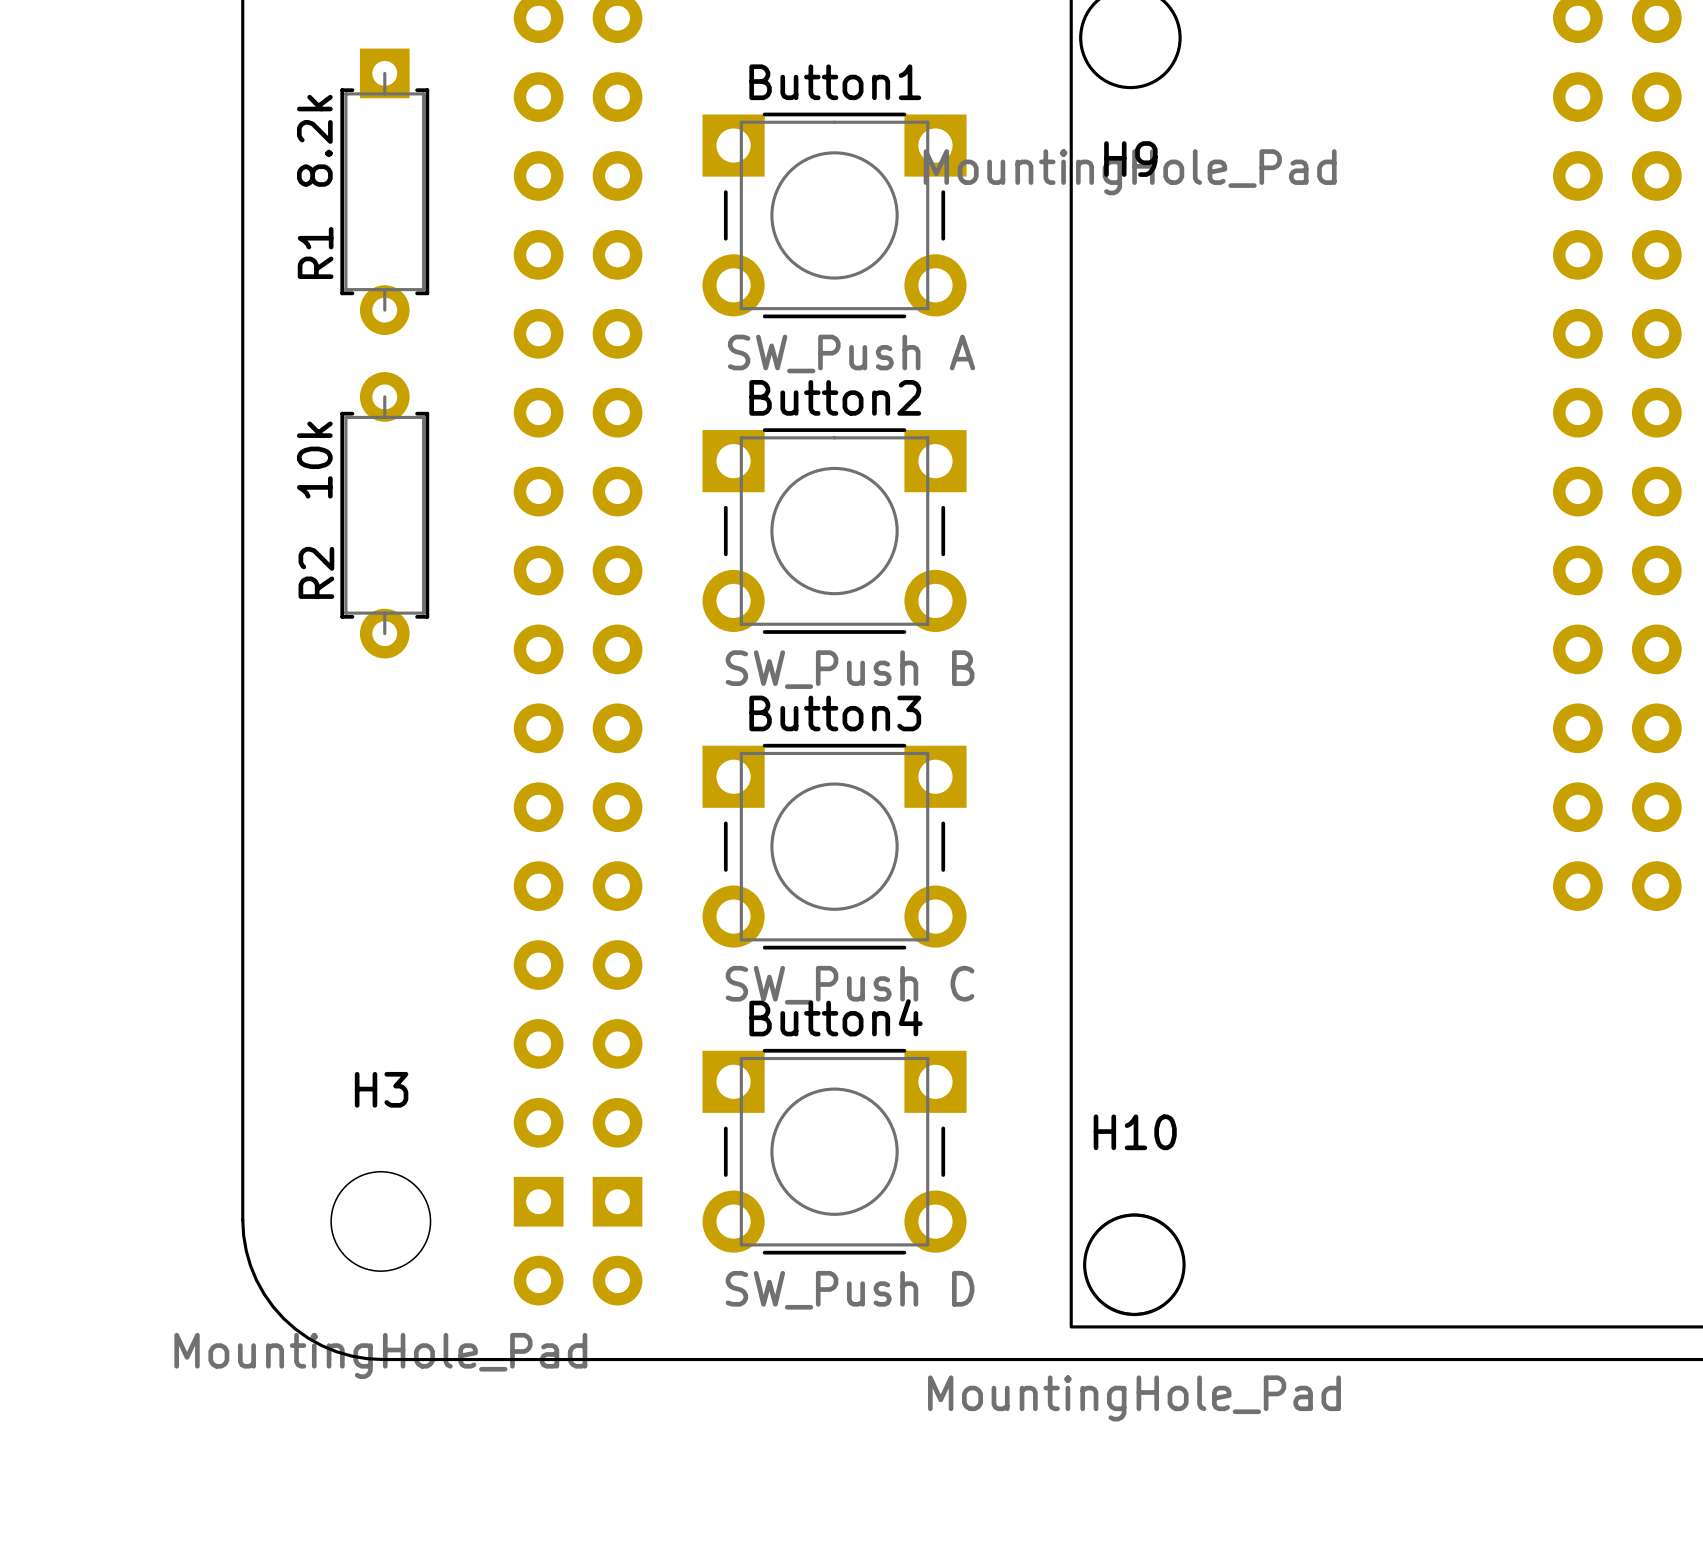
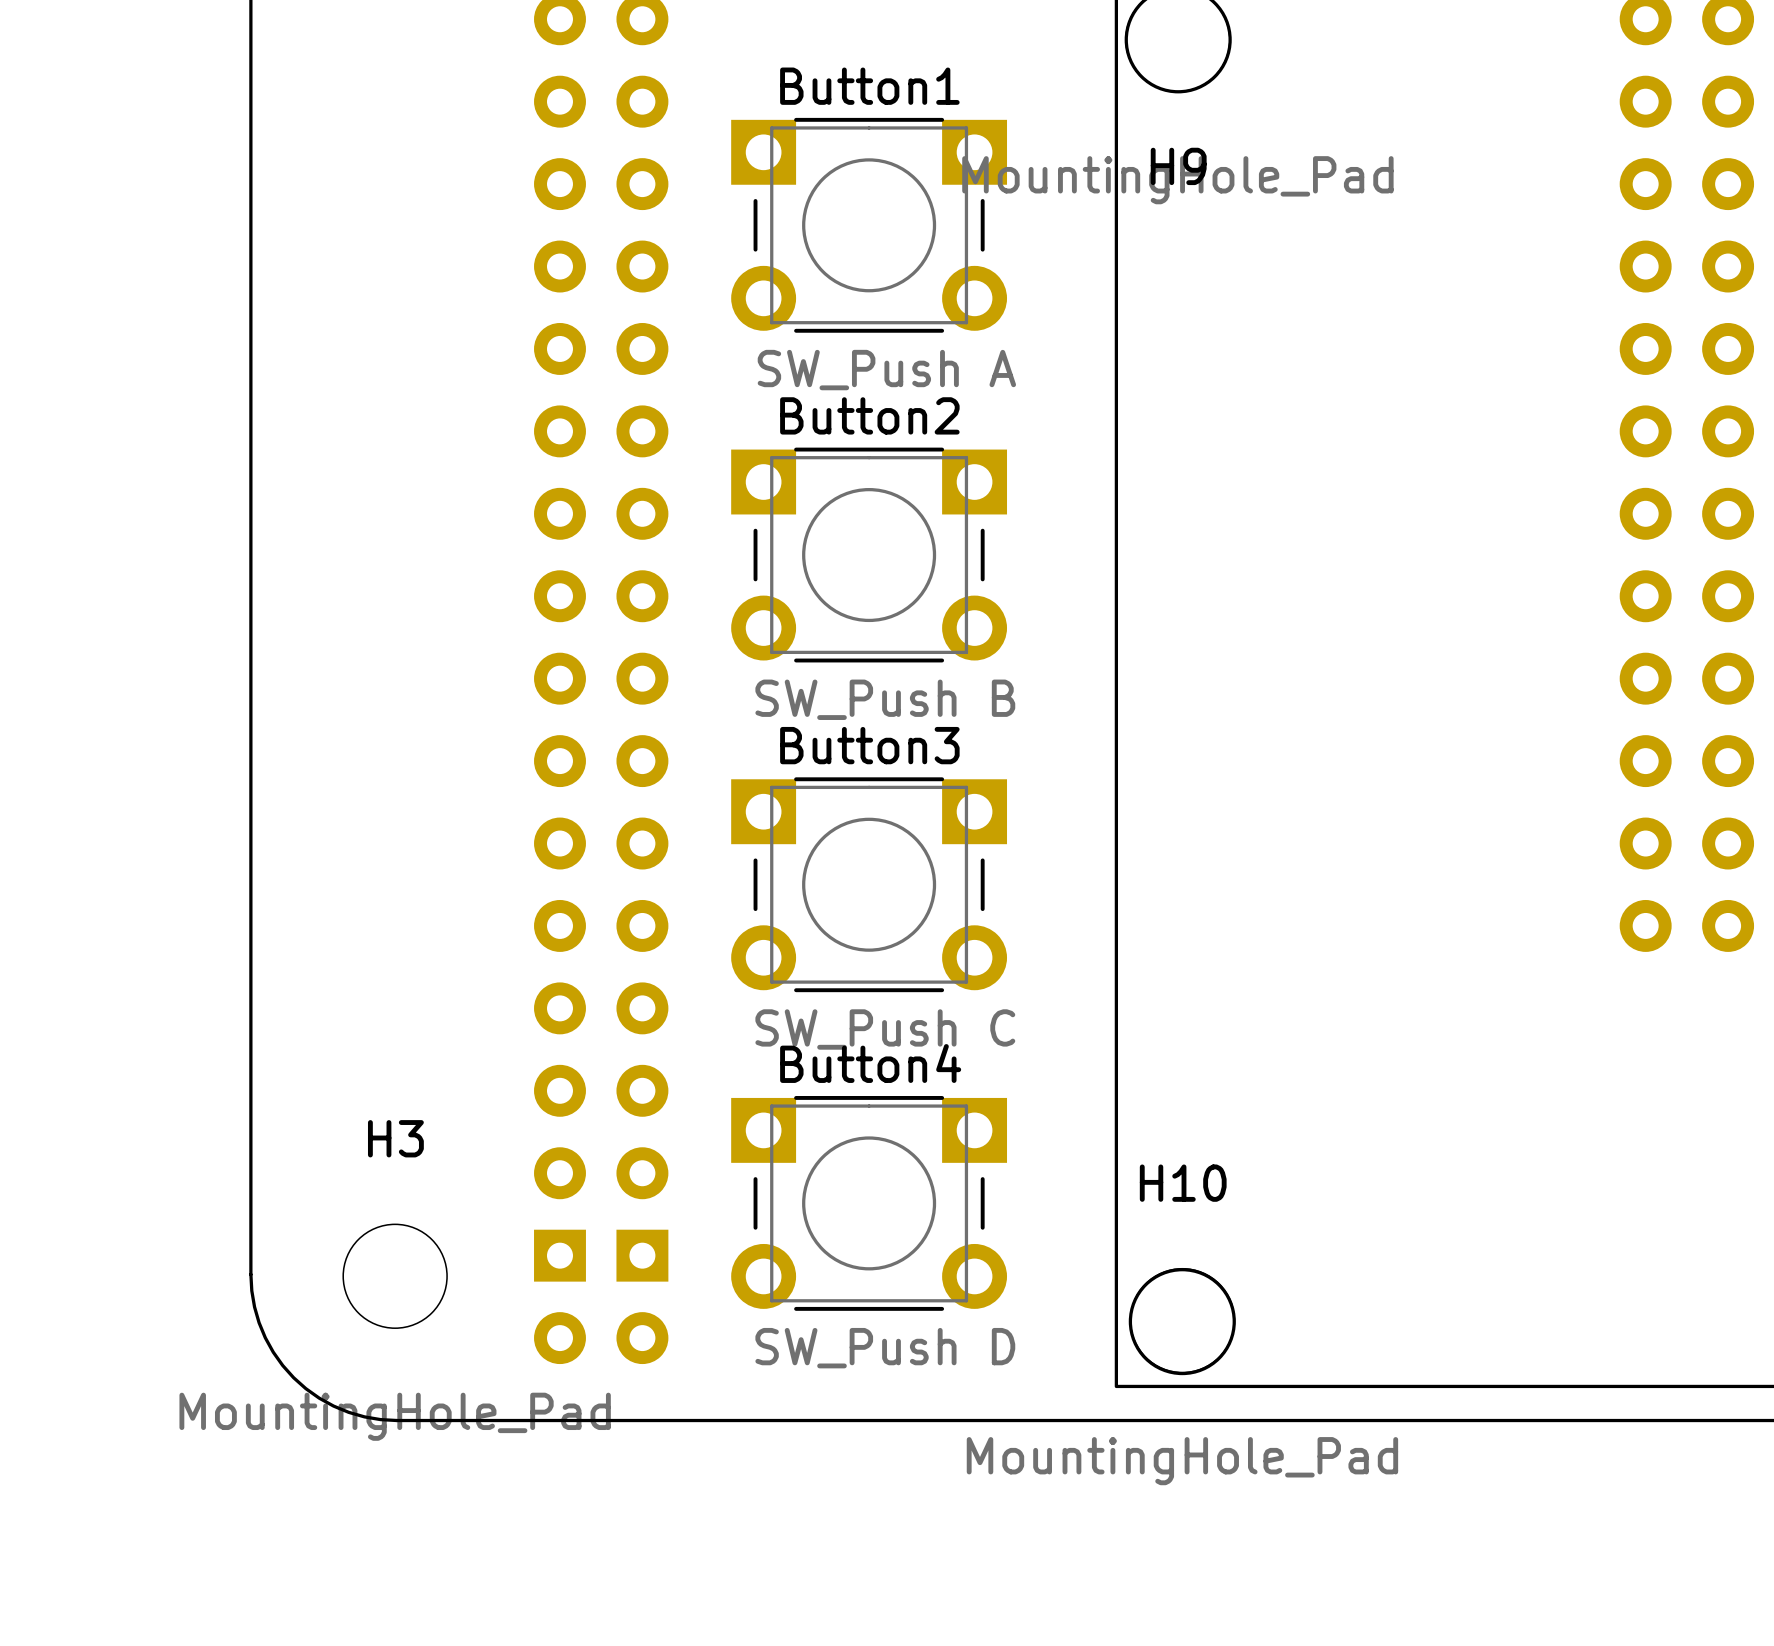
R1: 8.2k (384, 191) -> none
R2: 10k (384, 515) -> none

